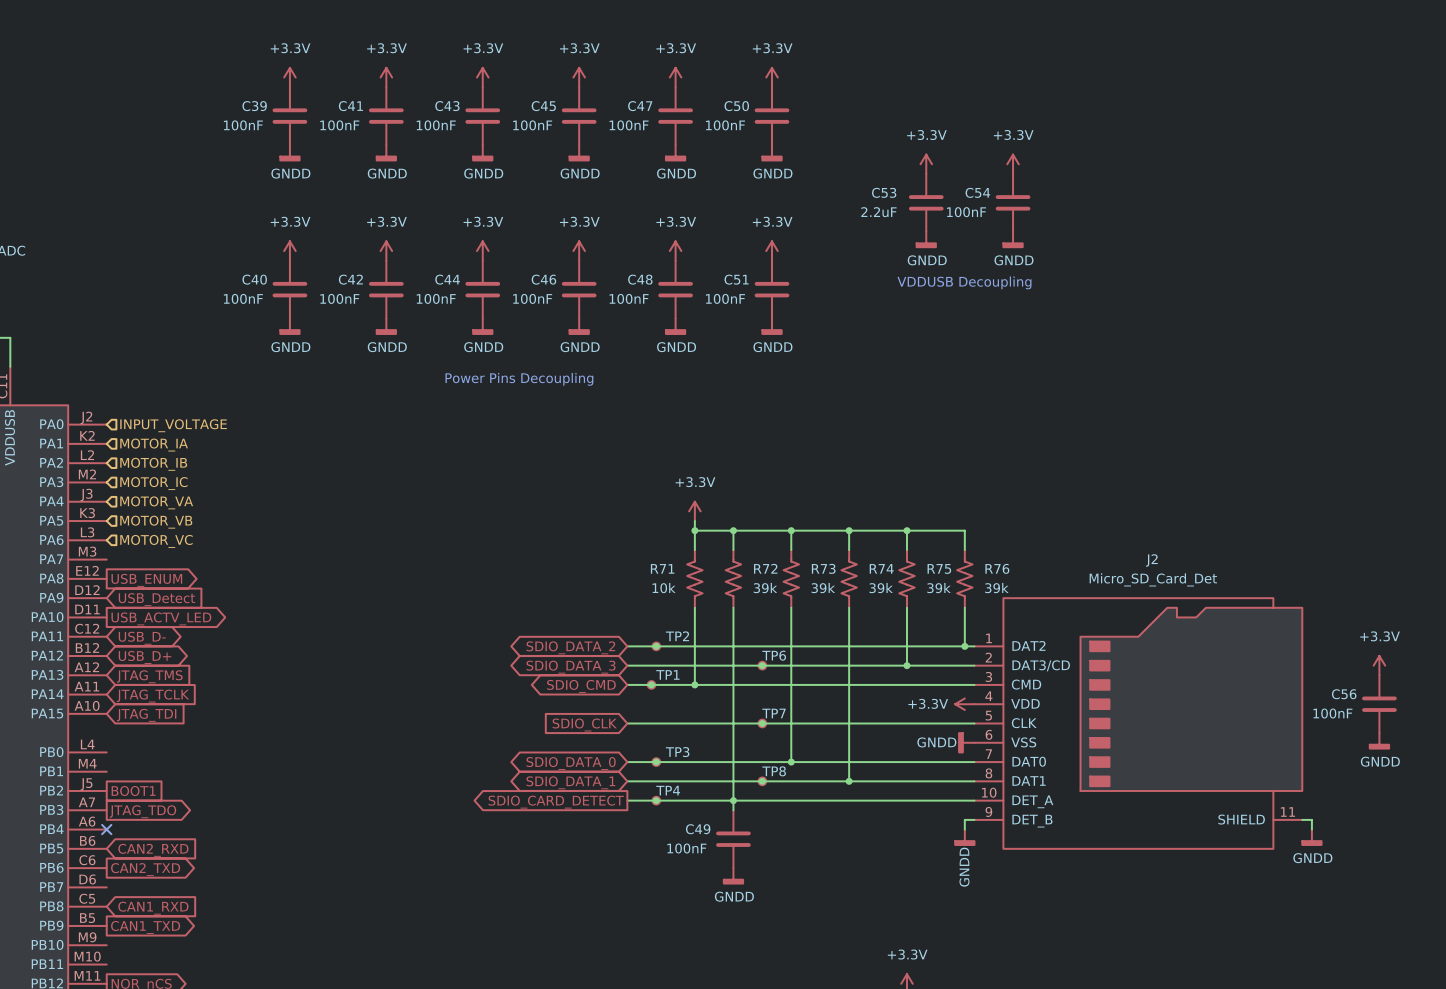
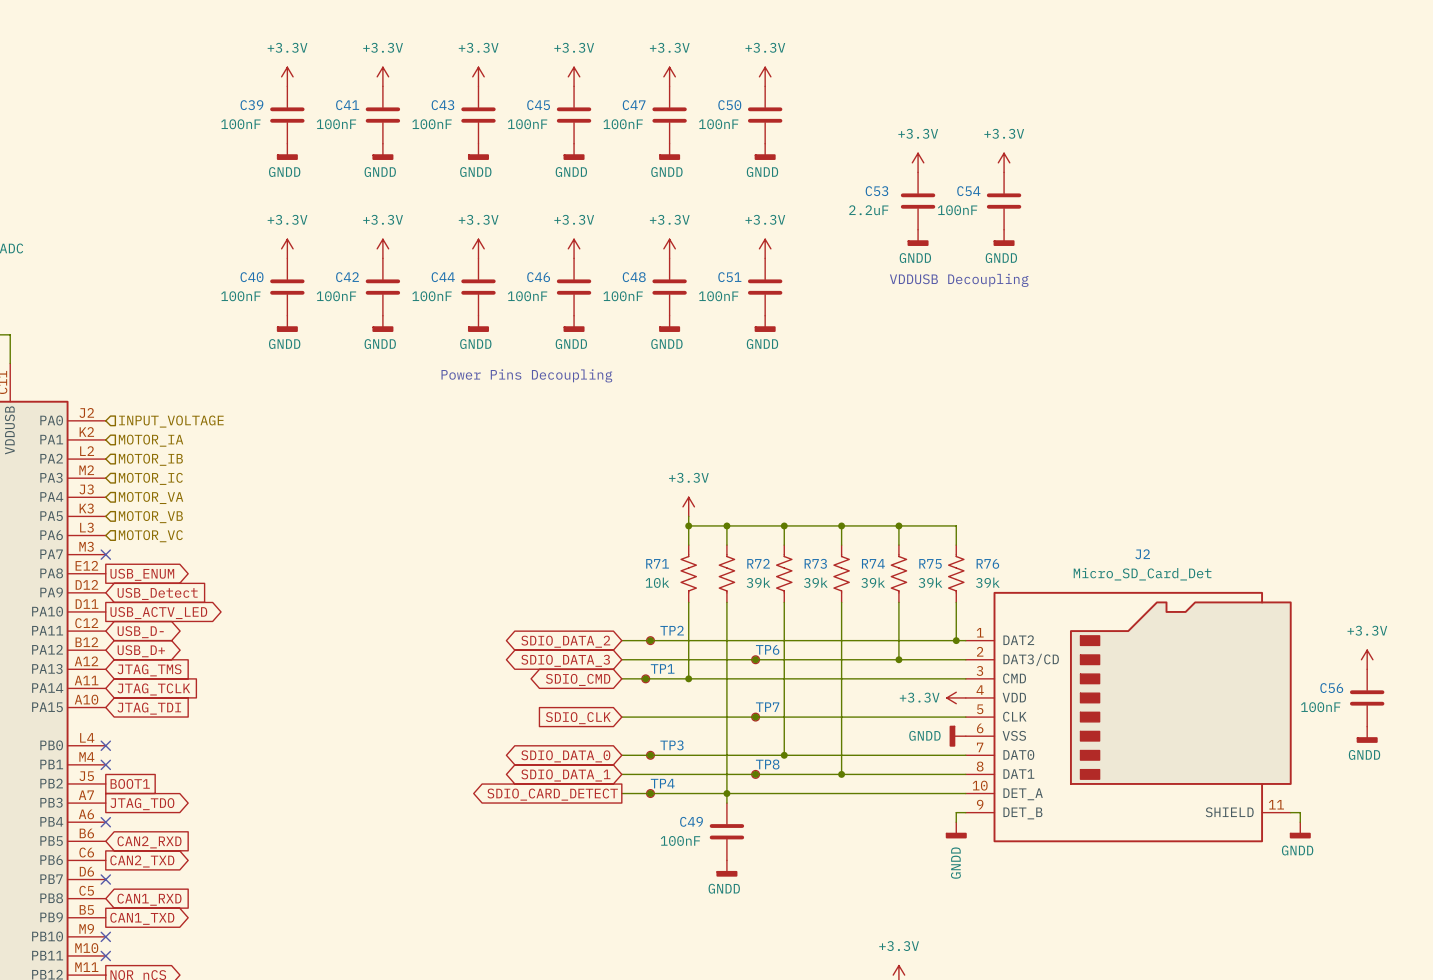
no-connect mark: none -> (105, 554)
no-connect mark: none -> (105, 745)
no-connect mark: none -> (105, 764)
no-connect mark: none -> (105, 879)
no-connect mark: none -> (105, 936)
no-connect mark: none -> (105, 955)

